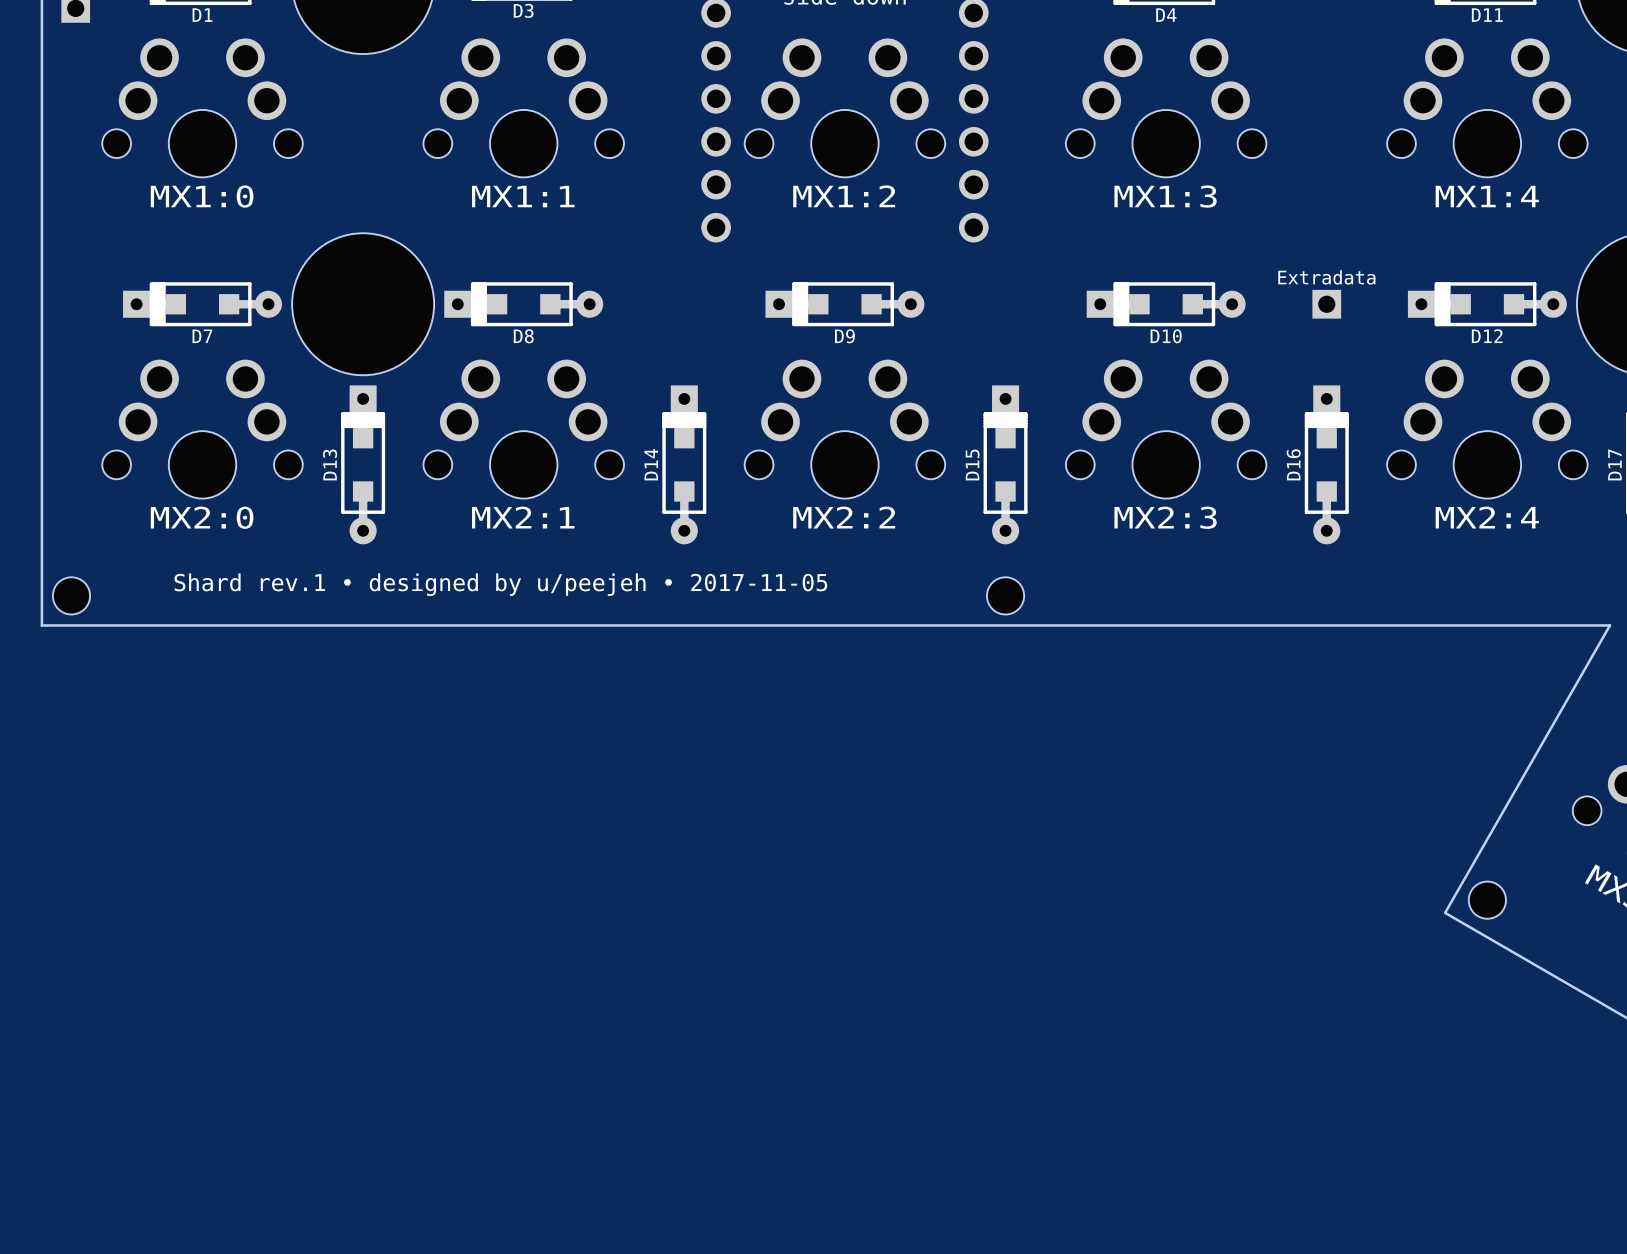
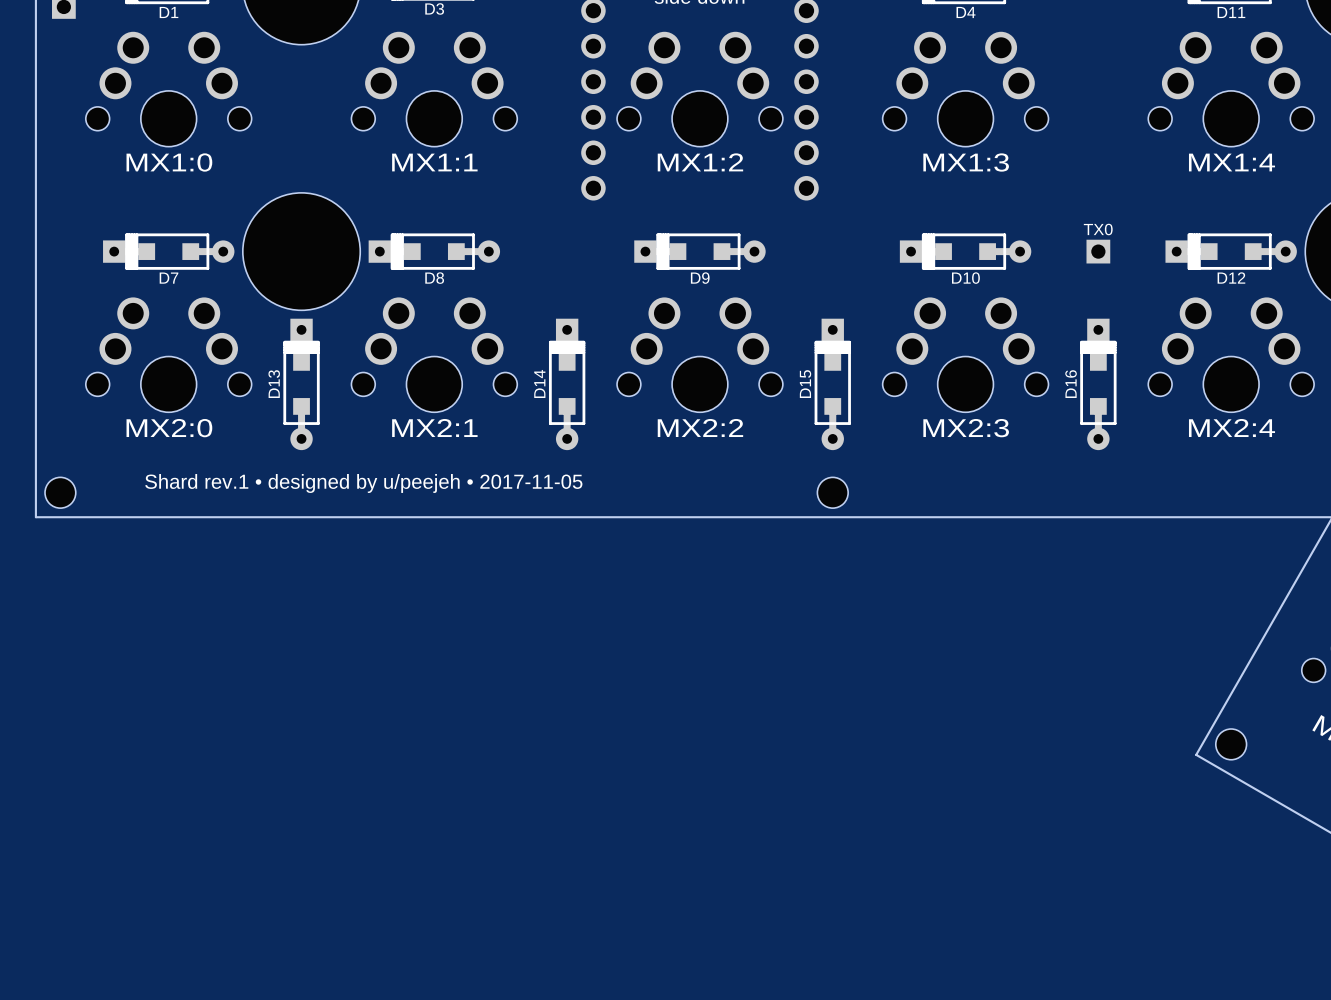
TX0 name: none -> TX0 (1098, 229)
TX0 value: Extradata (1326, 277) -> none

